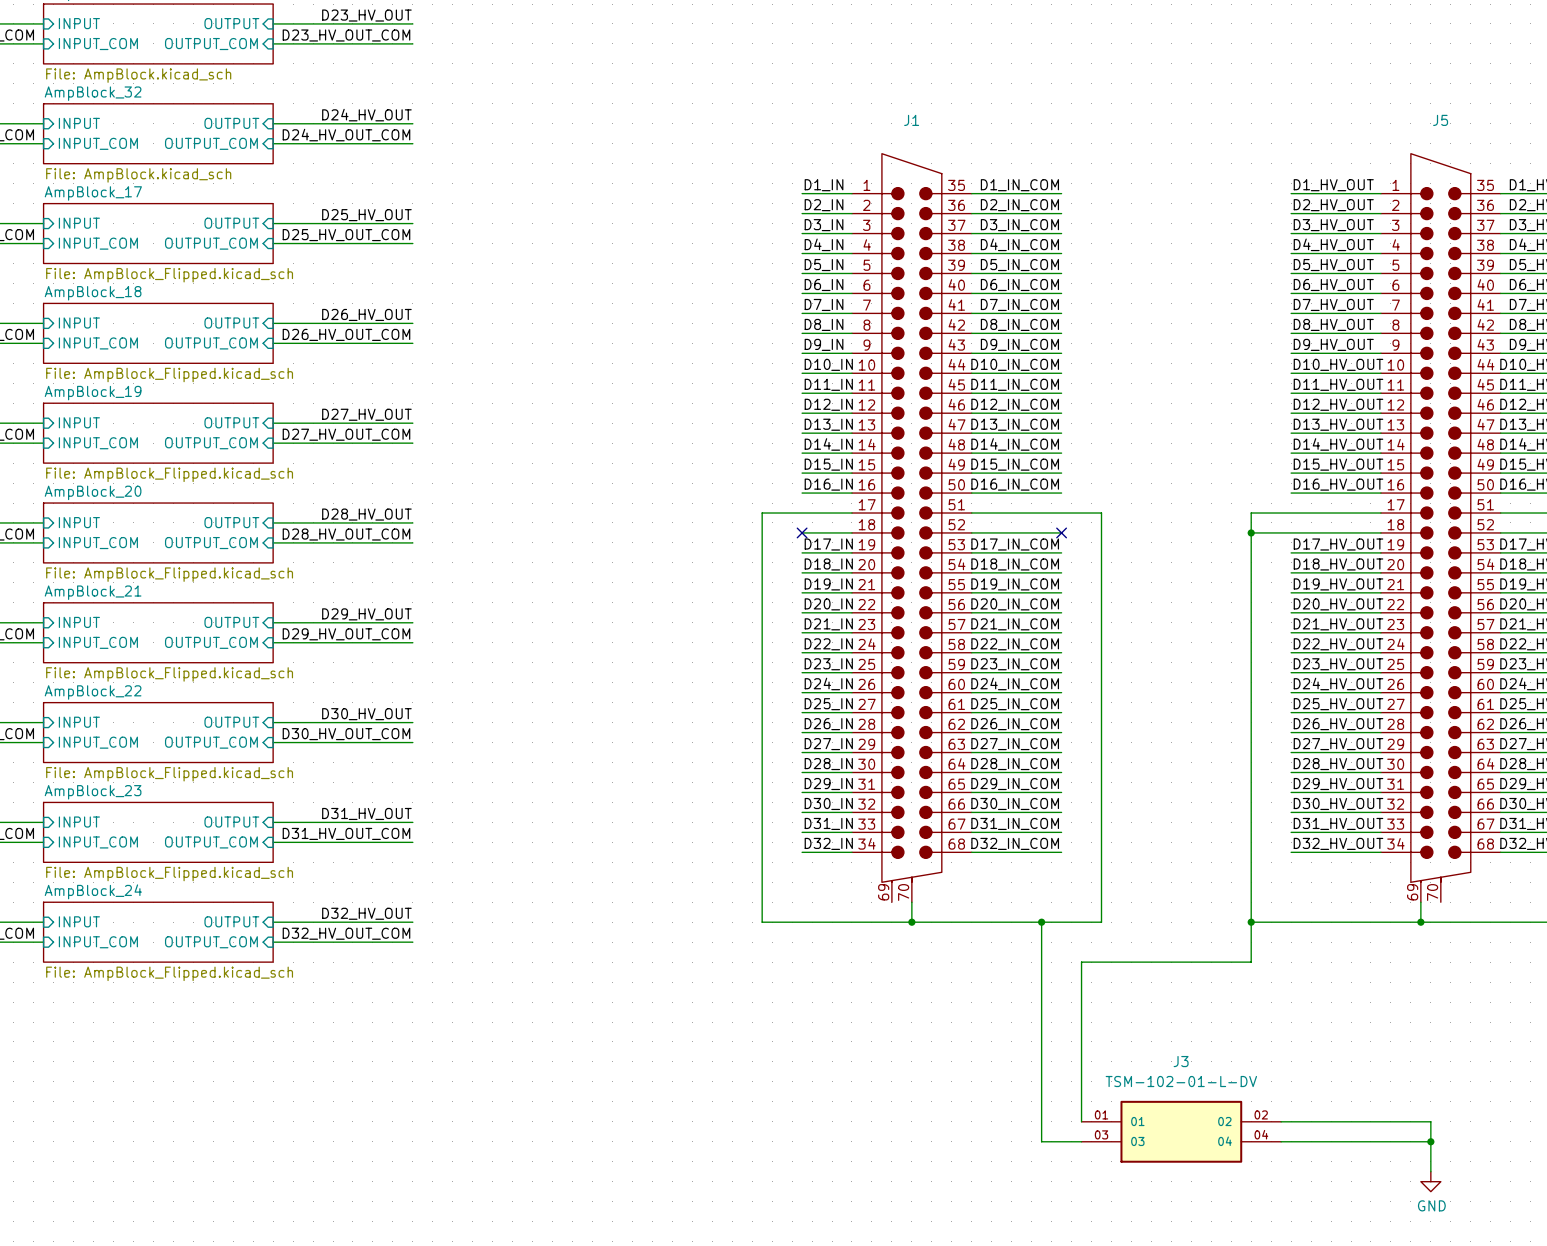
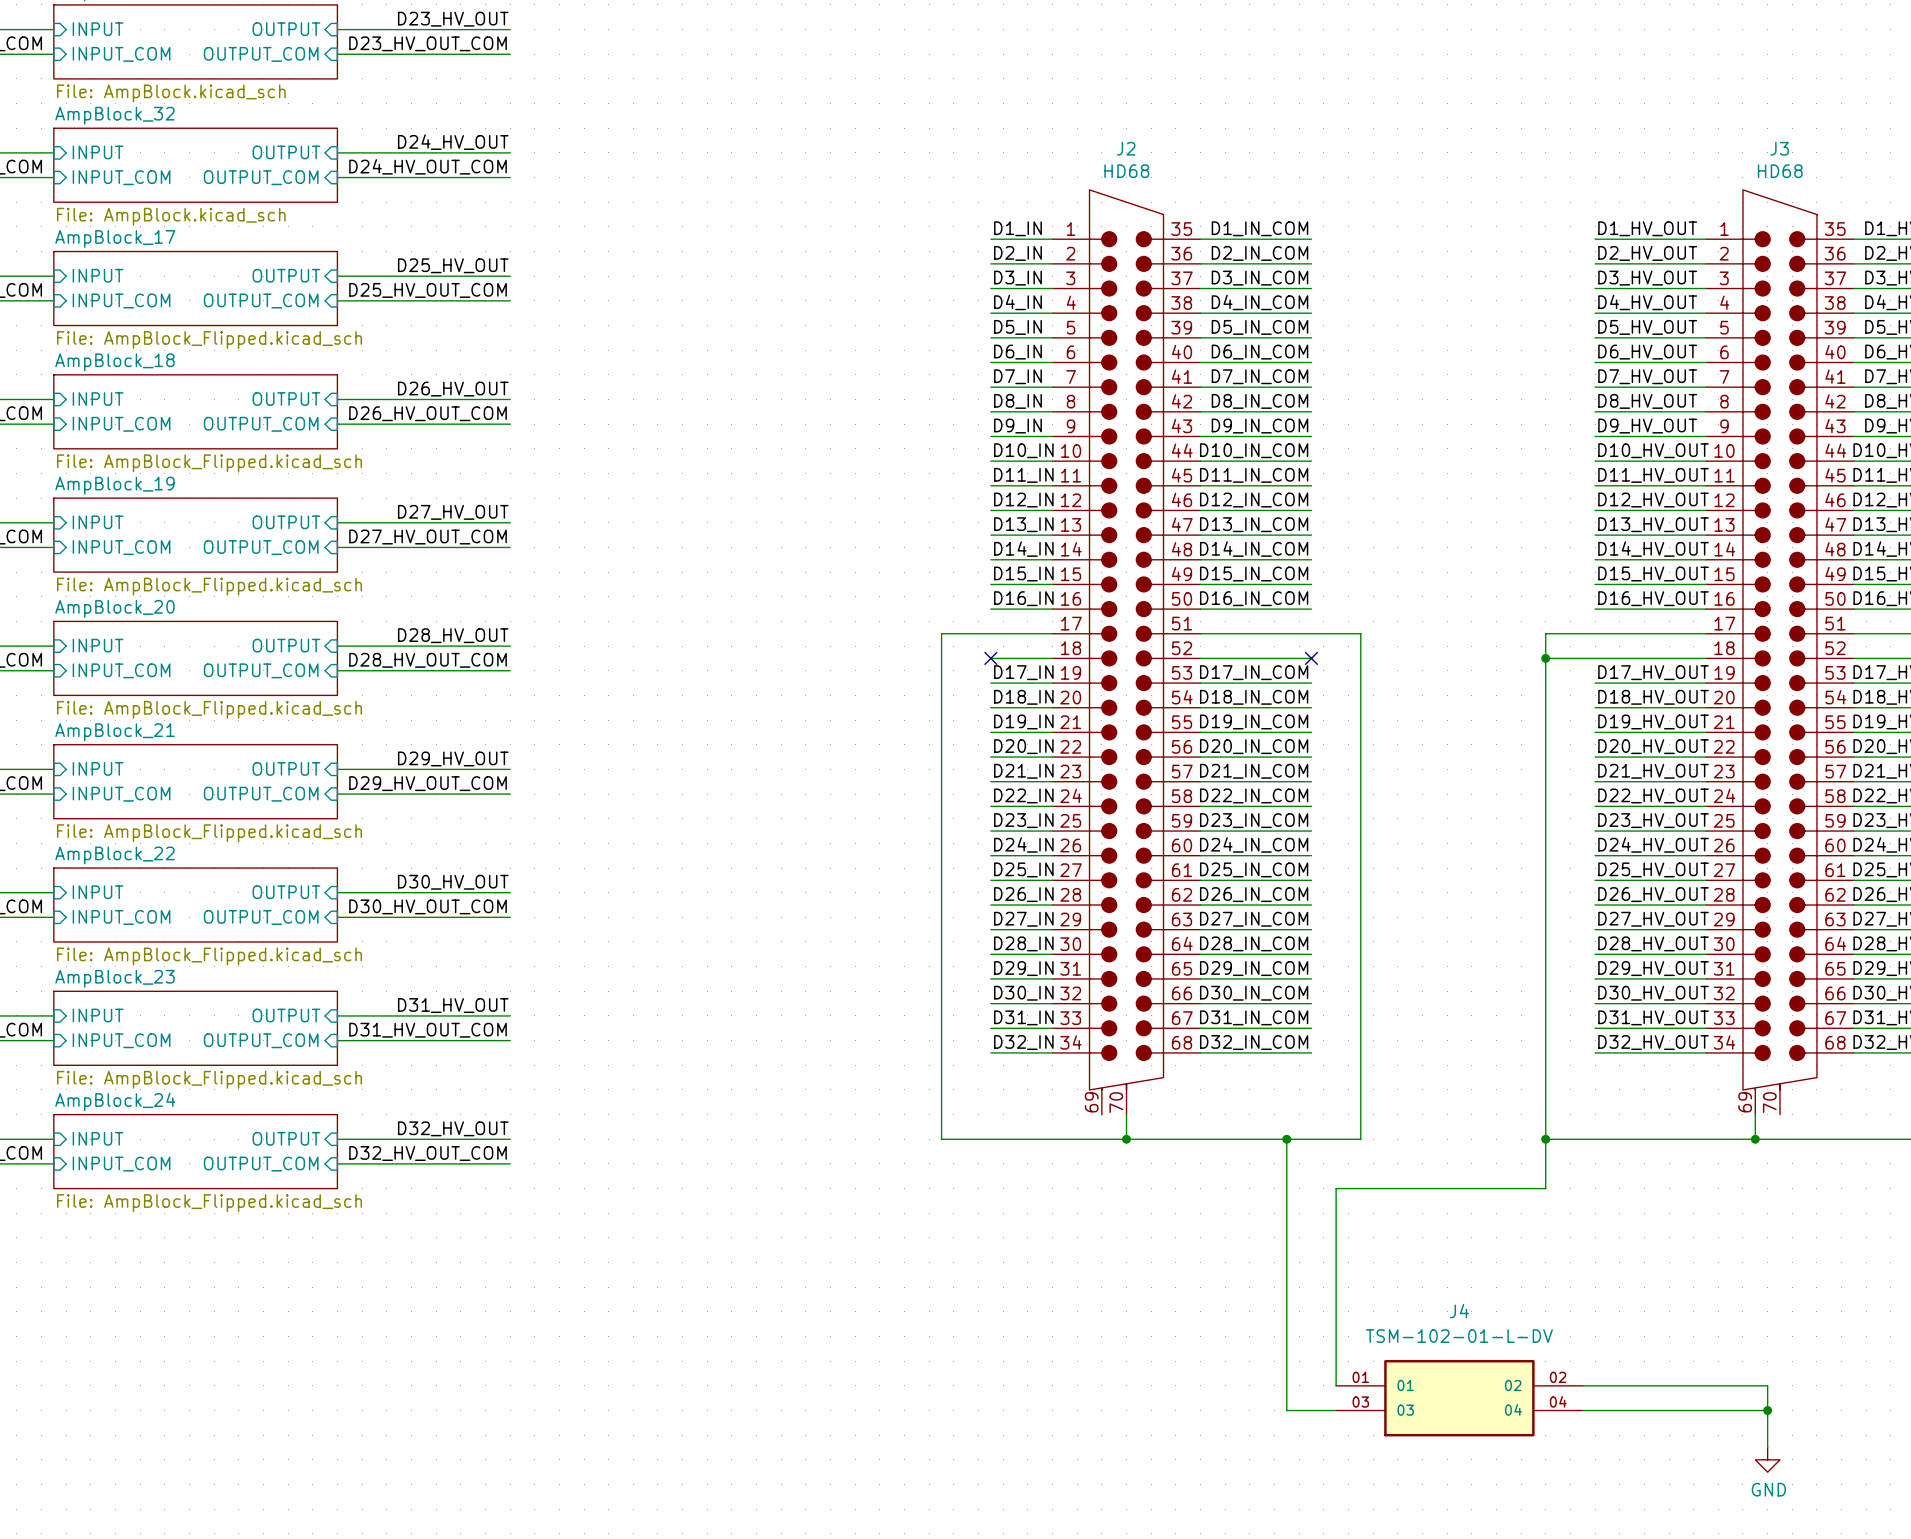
J1 name: J1 (911, 120) -> J2 (1126, 148)
J5 name: J5 (1440, 120) -> J3 (1779, 148)
J1 value: none -> HD68 (1126, 171)
J5 value: none -> HD68 (1780, 171)
J3 name: J3 (1181, 1061) -> J4 (1459, 1311)

